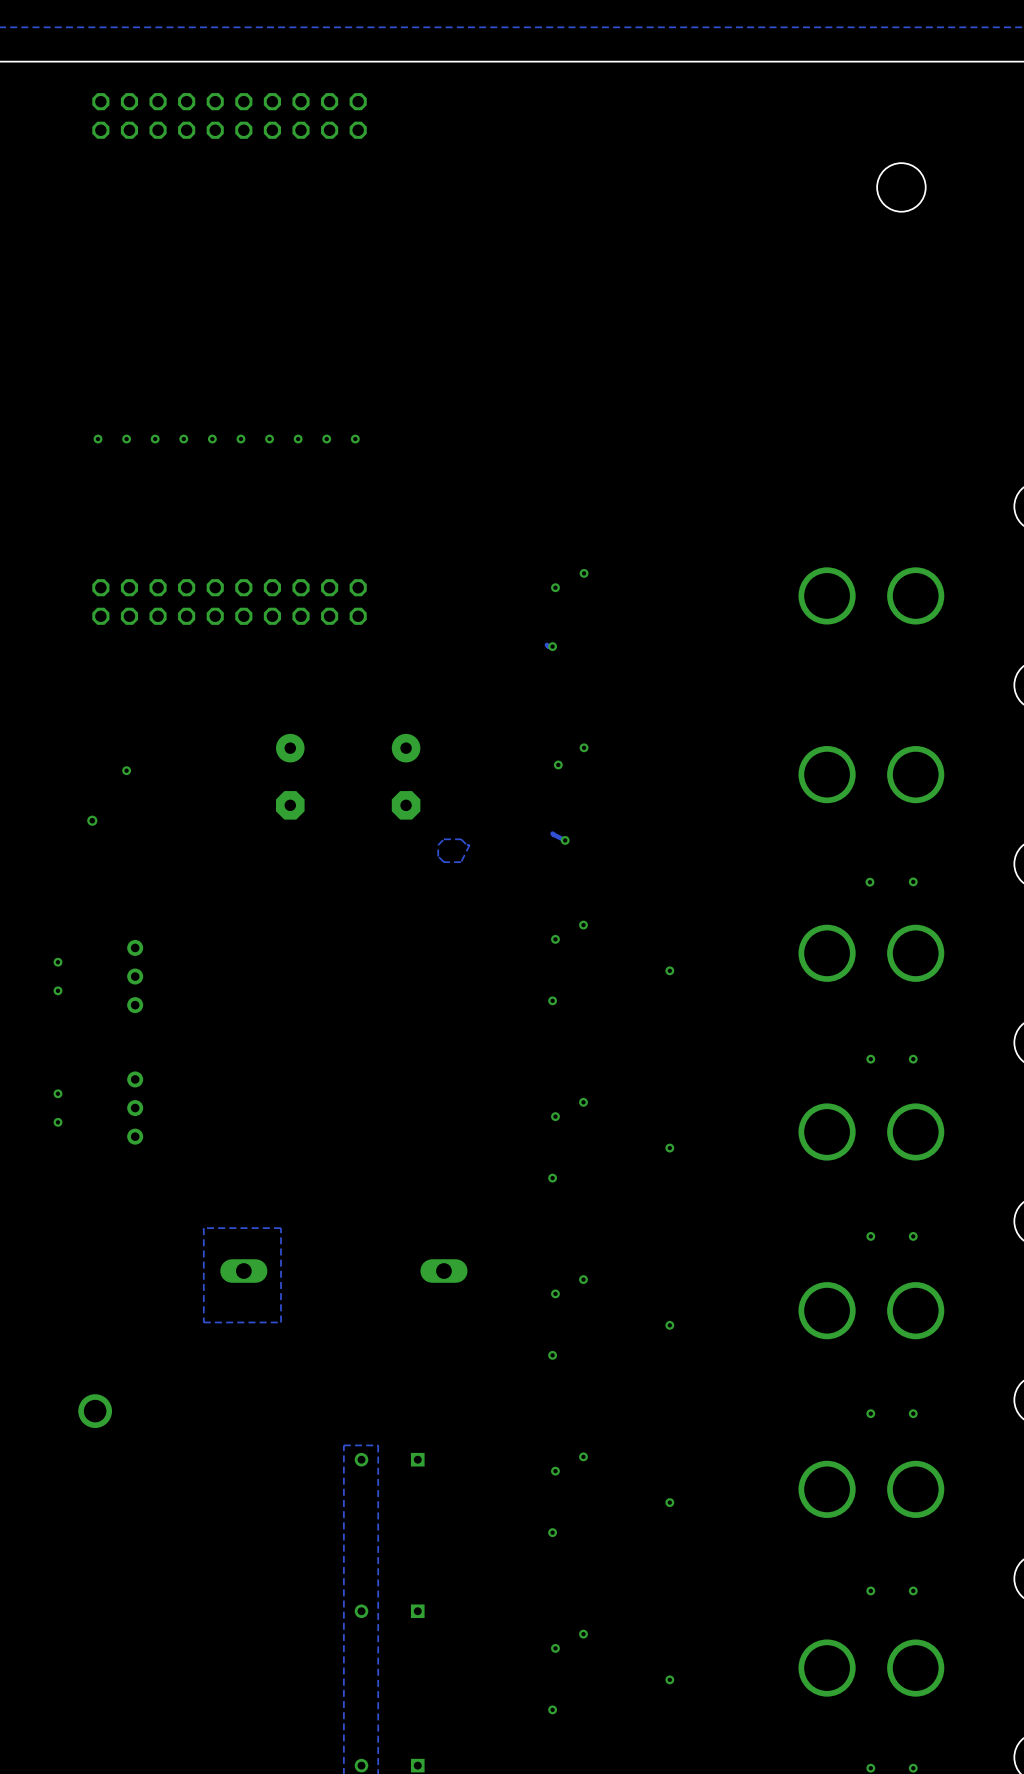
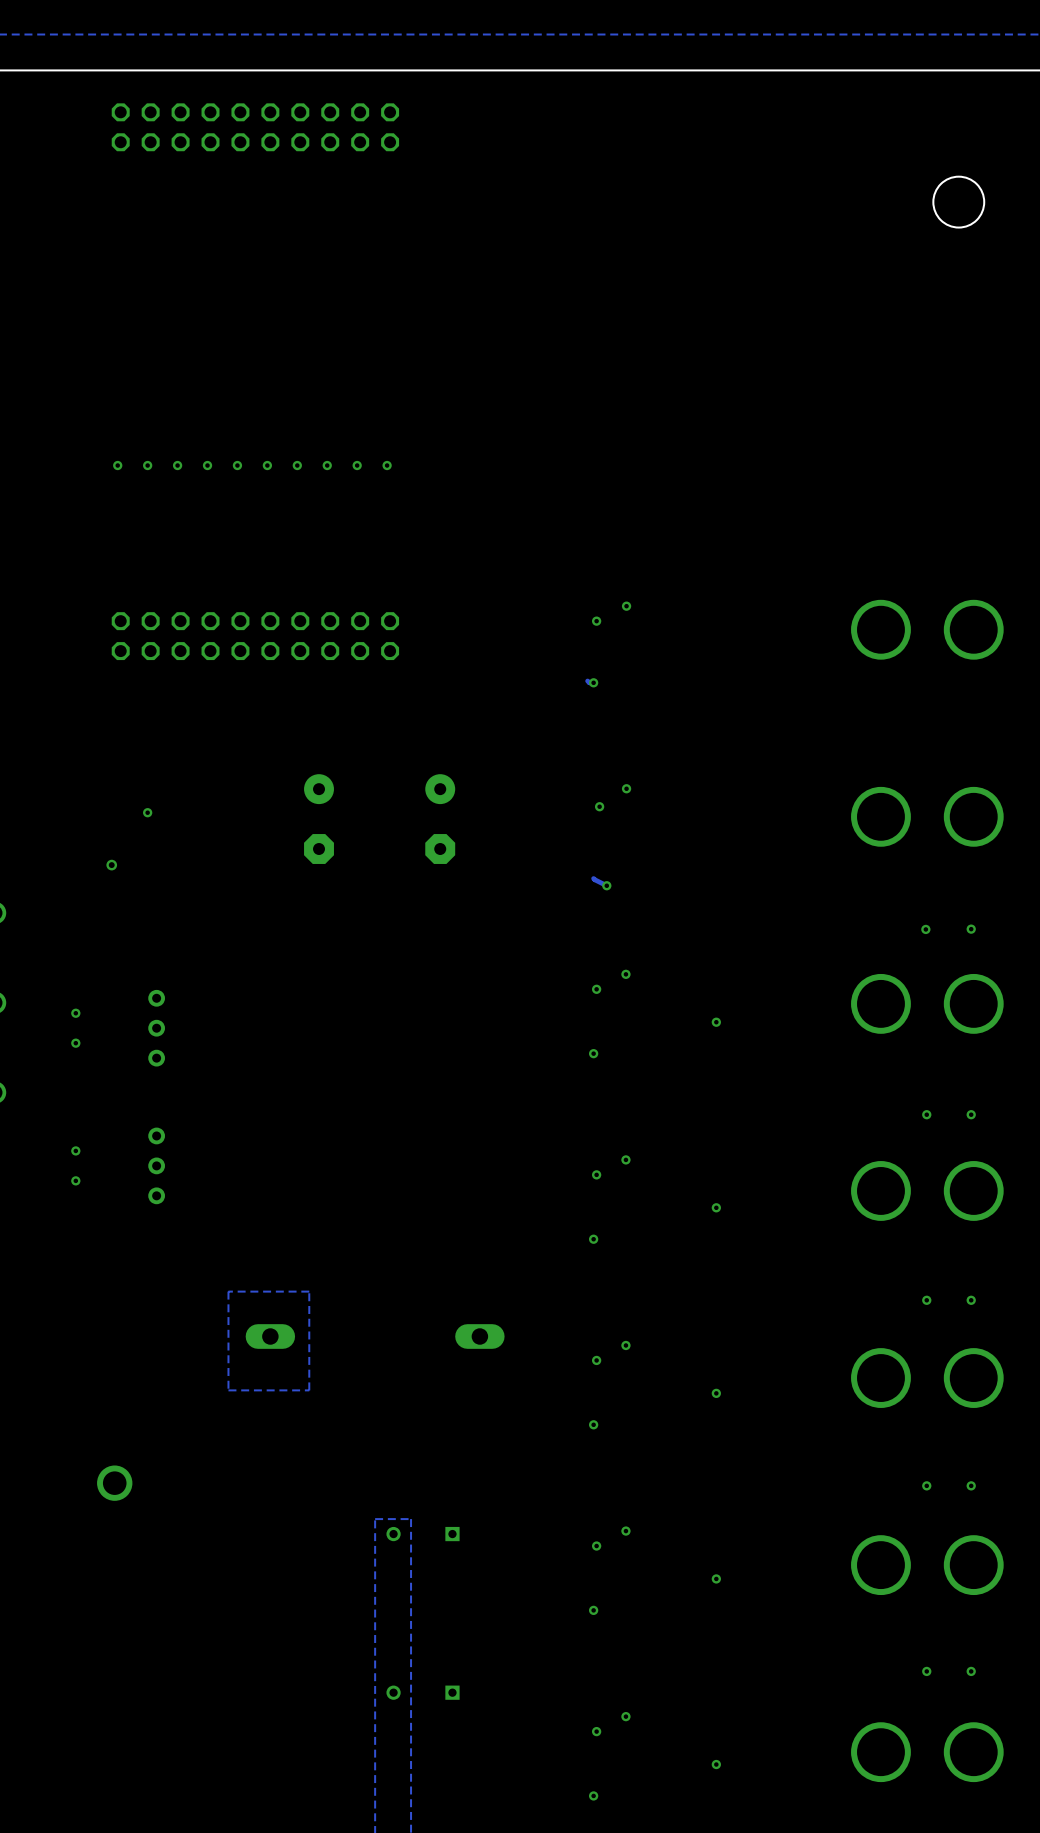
zone outline: (461, 839) (443, 839) (438, 845) (438, 856) (443, 862) (461, 862) (469, 845) (466, 845) (461, 839) -> none

